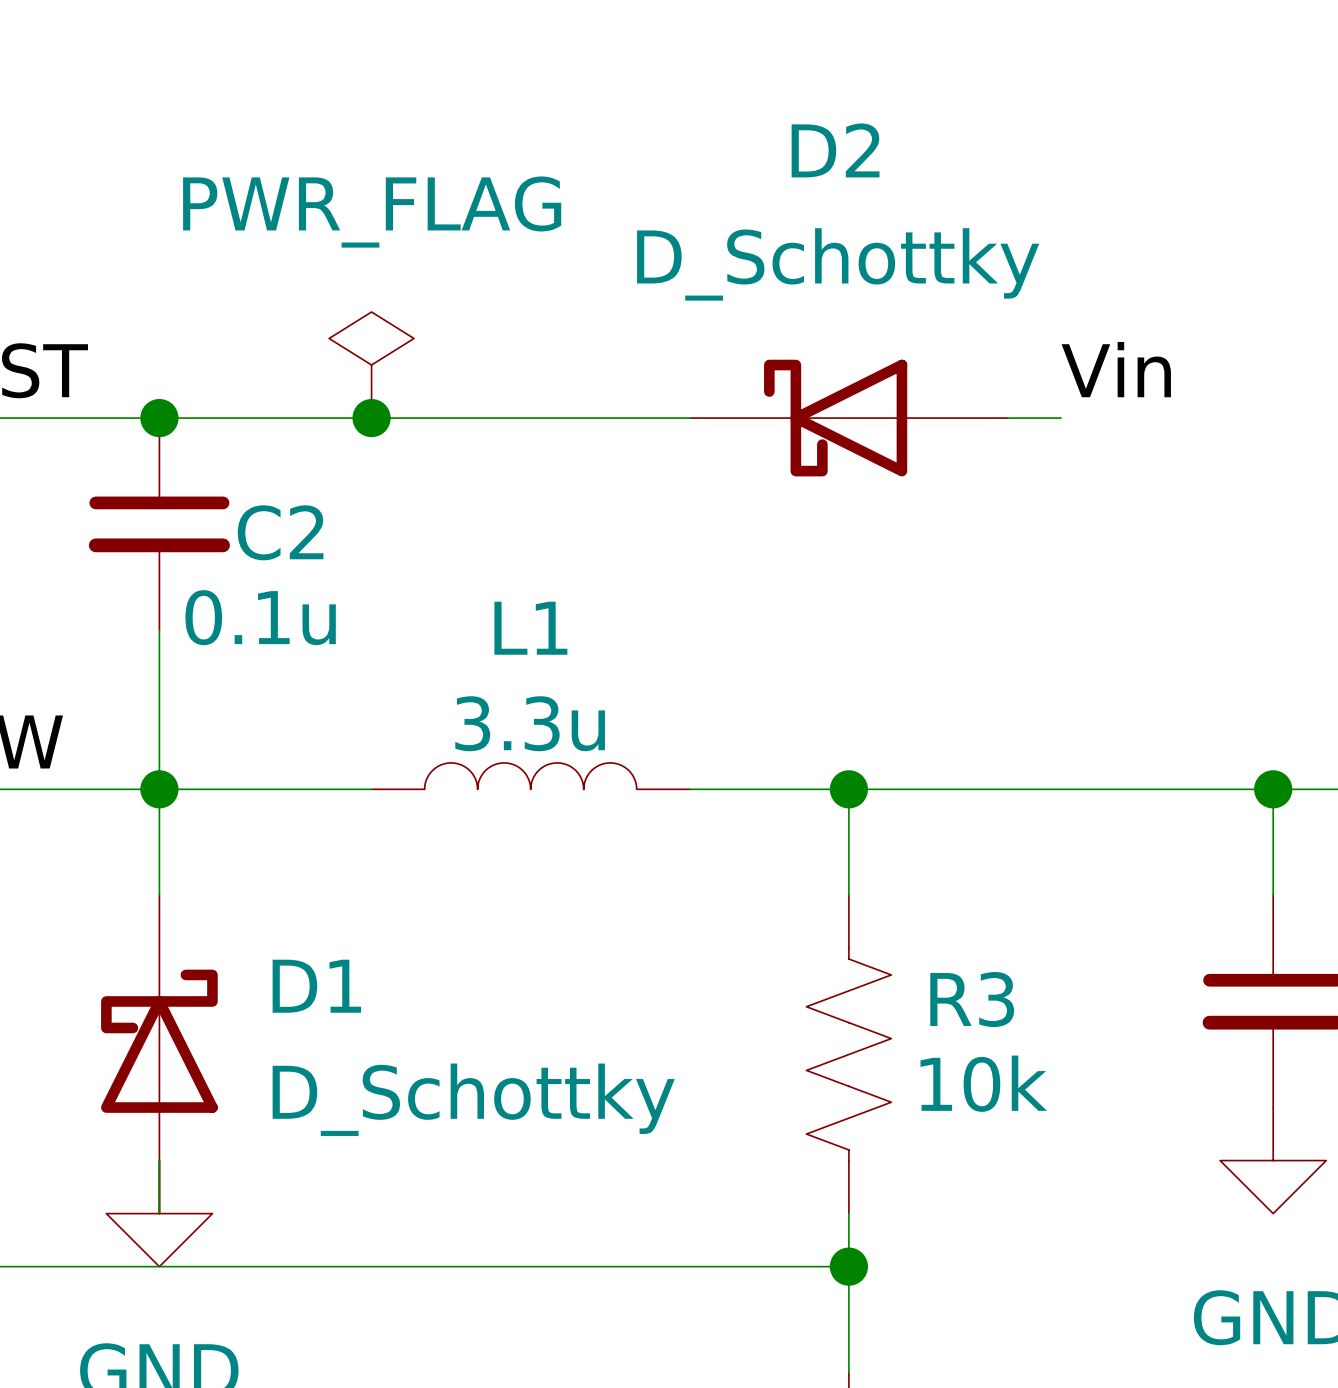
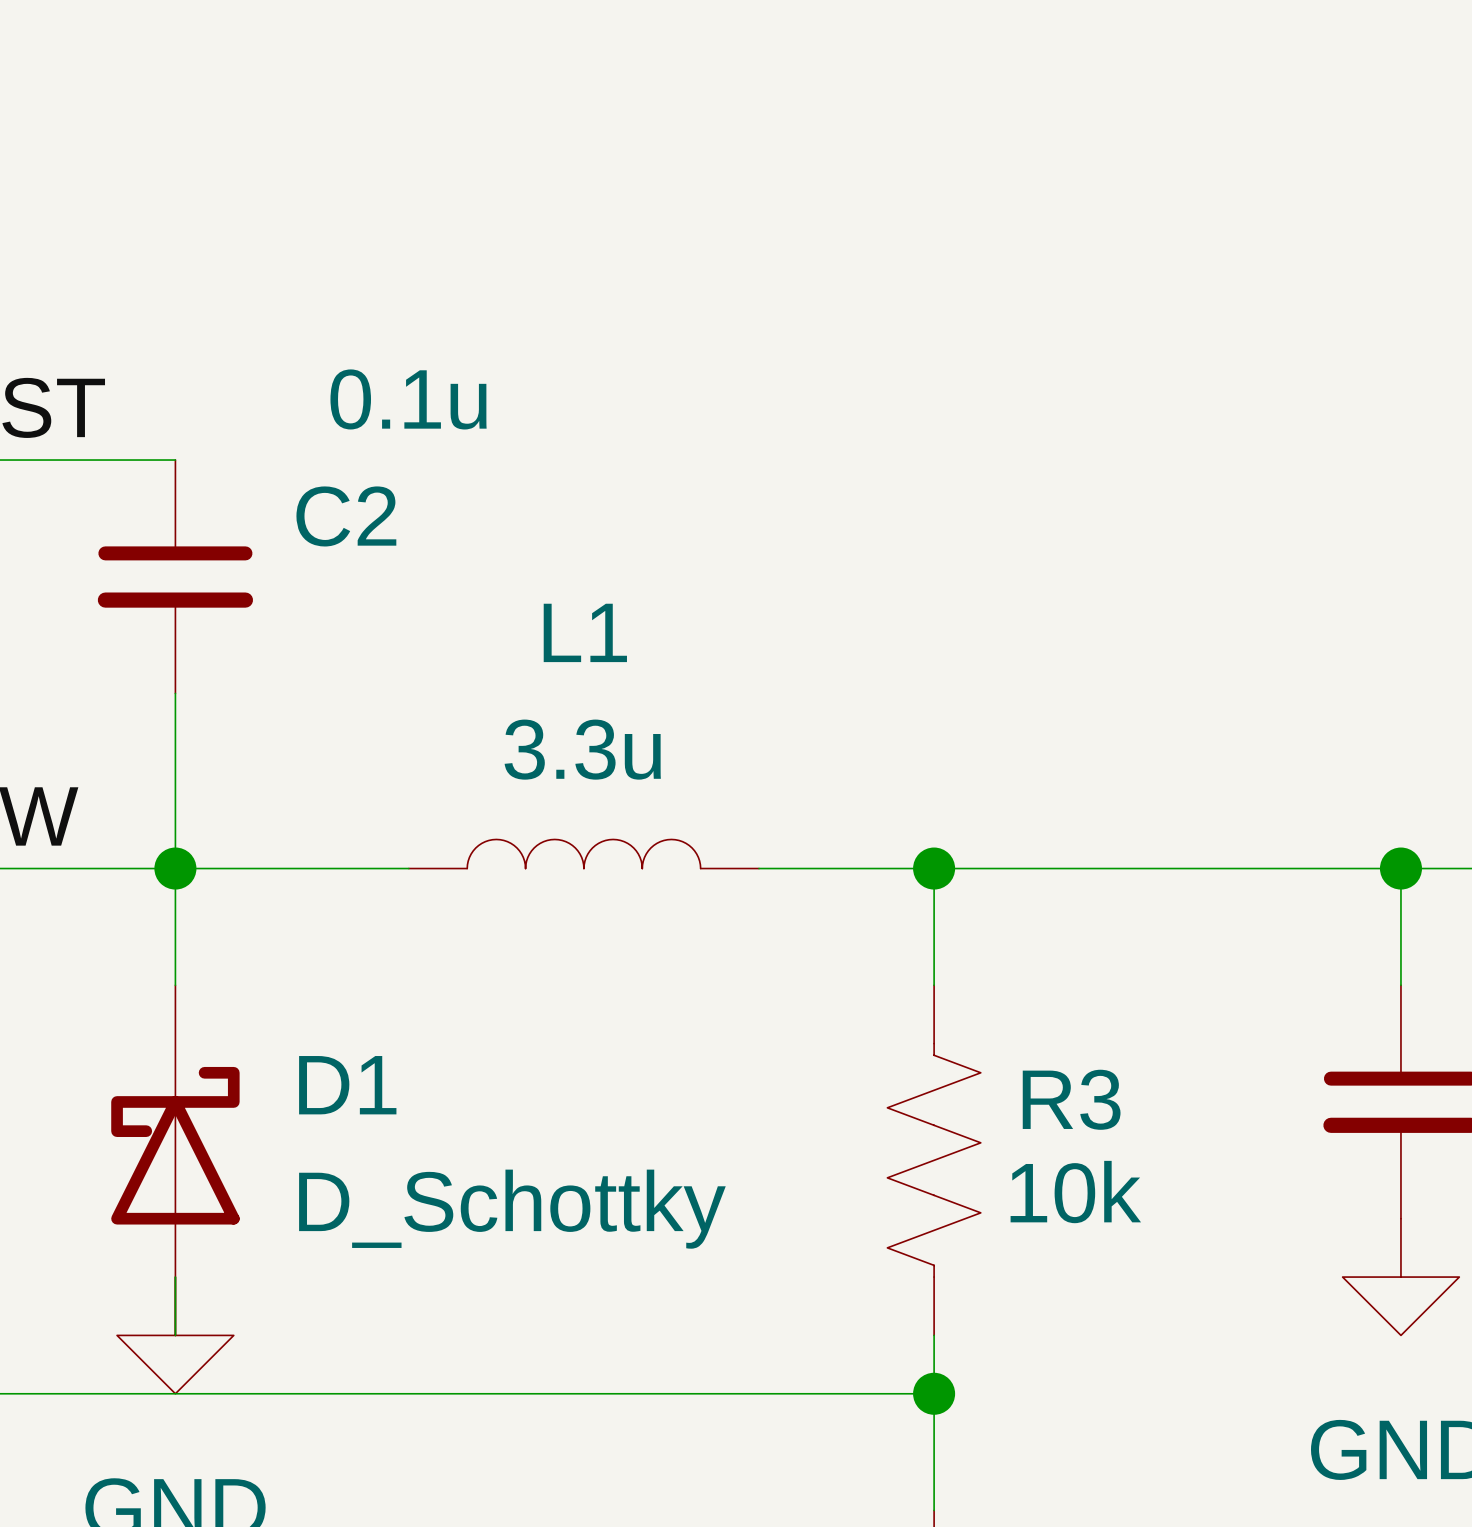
power symbol: PWR_FLAG (371, 365) -> none
label: Vin (1116, 369) -> none
wire: (159, 418) (689, 418) -> none
junction: (159, 418) -> none
junction: (371, 418) -> none
D2: D_Schottky (848, 418) -> none
wire: (1008, 418) (1061, 418) -> none
C2 name position: C2 (280, 532) -> C2 (346, 516)
C2 value position: 0.1u (260, 617) -> 0.1u (408, 399)
L1 name position: L1 (530, 628) -> L1 (585, 632)
L1 value position: 3.3u (530, 723) -> 3.3u (582, 749)

